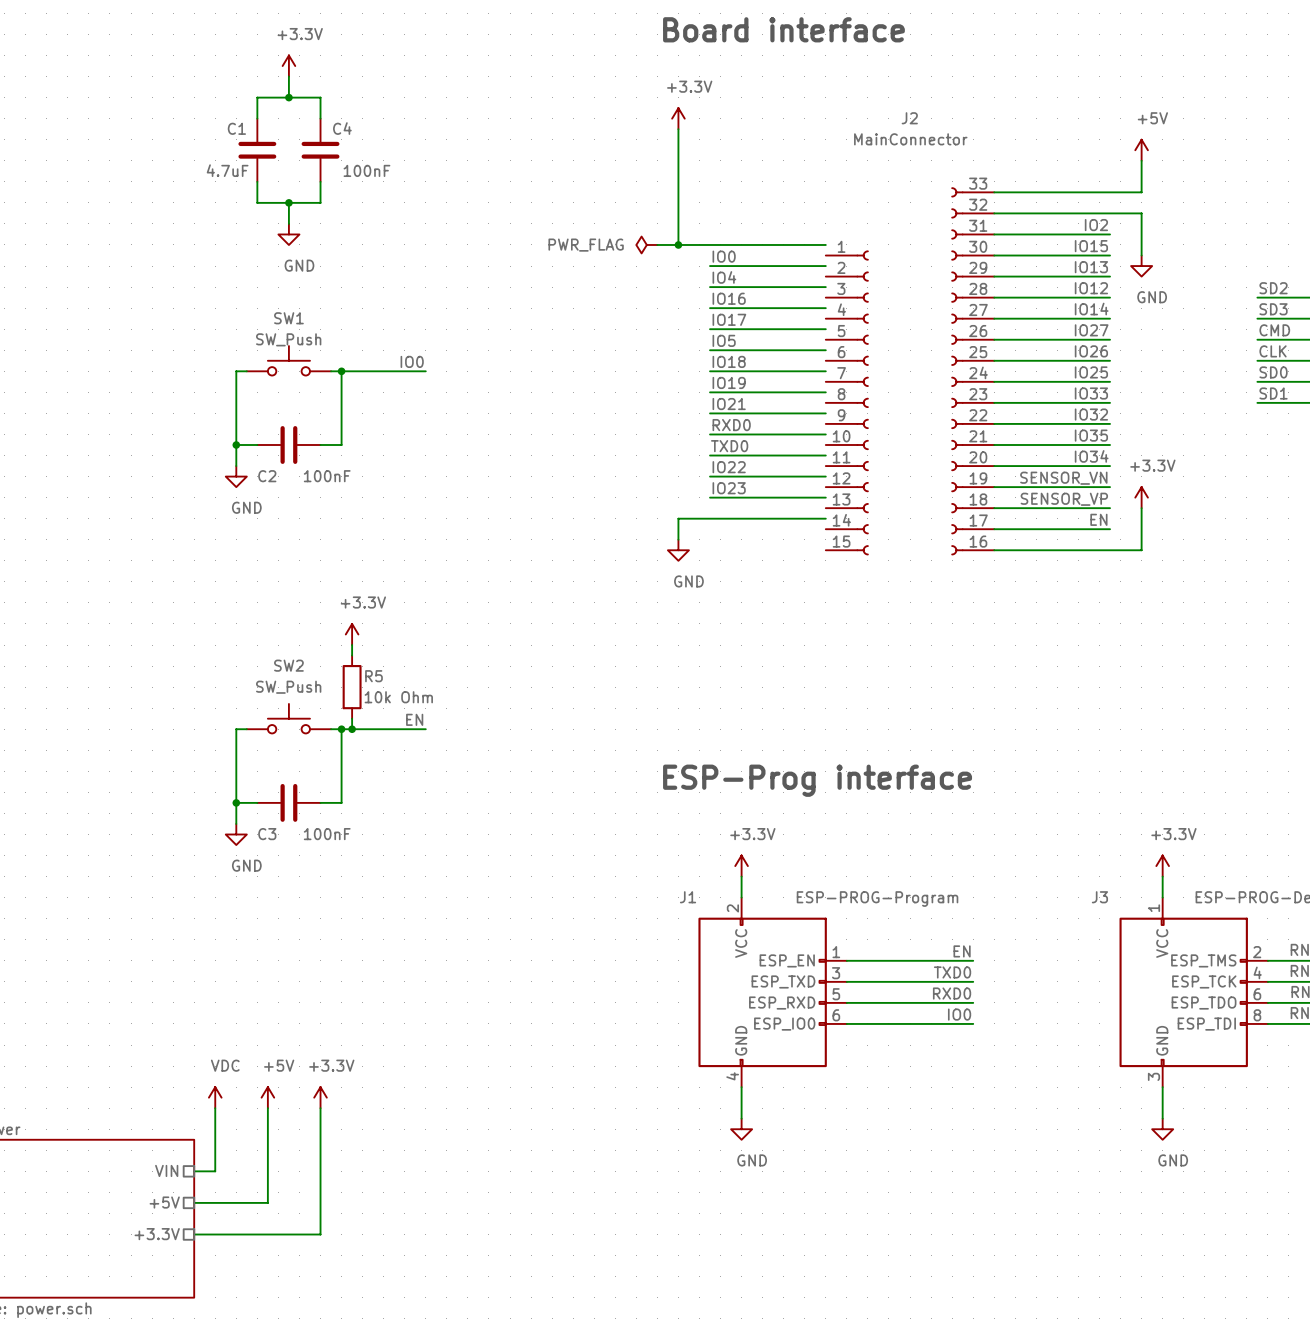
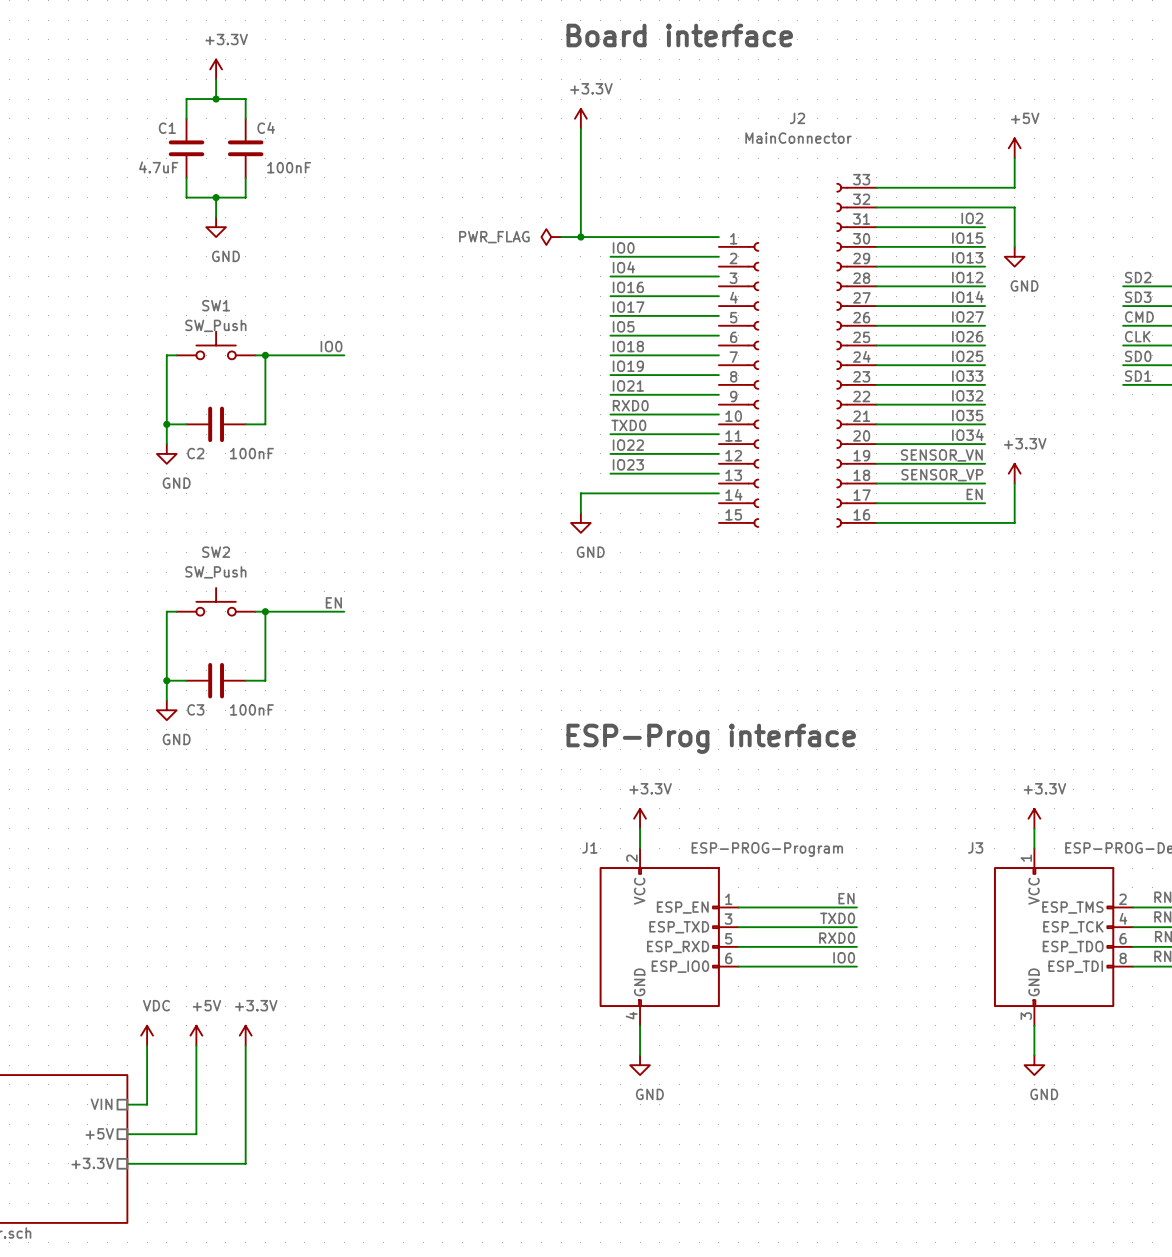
power symbol: +3.3V (352, 634) -> none
junction: none -> (265, 611)
wire: (352, 645) (352, 655) -> none
R5: 10k Ohm (352, 687) -> none
junction: none -> (166, 680)
SW2 position: (288, 718) -> (216, 601)
wire: (352, 718) (352, 729) -> none
label position: EN (414, 719) -> EN (333, 602)
wire: (236, 729) (246, 729) -> (166, 690) (166, 611) (176, 611)
wire: (331, 729) (425, 729) -> (255, 611) (344, 611)
wire: (341, 729) (341, 802) (320, 802) -> (265, 611) (265, 680) (245, 680)
junction: (341, 729) -> none
junction: (352, 729) -> none
wire: (236, 739) (236, 823) -> none
wire: (236, 802) (257, 802) -> (166, 680) (186, 680)
junction: (236, 802) -> none
C3 position: (288, 802) -> (216, 680)
power symbol position: GND (236, 834) -> GND (166, 710)

